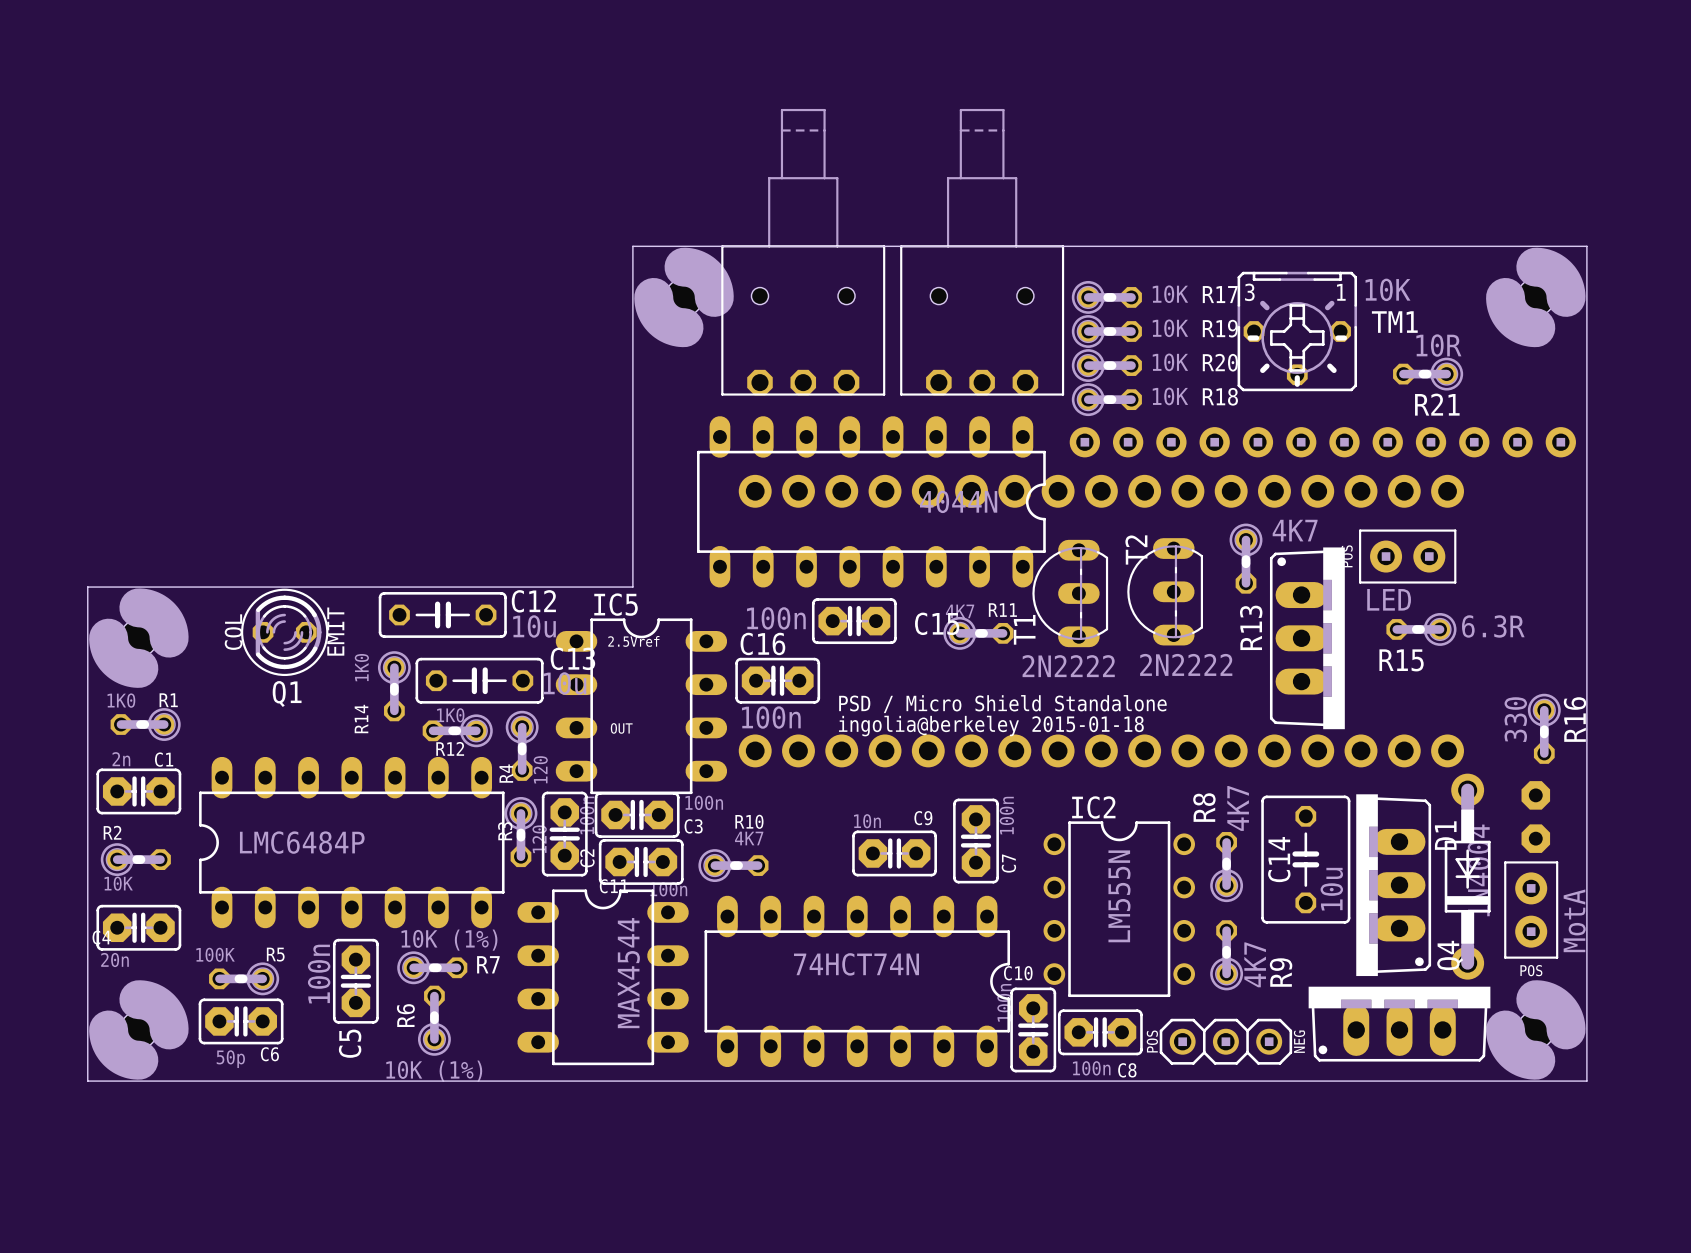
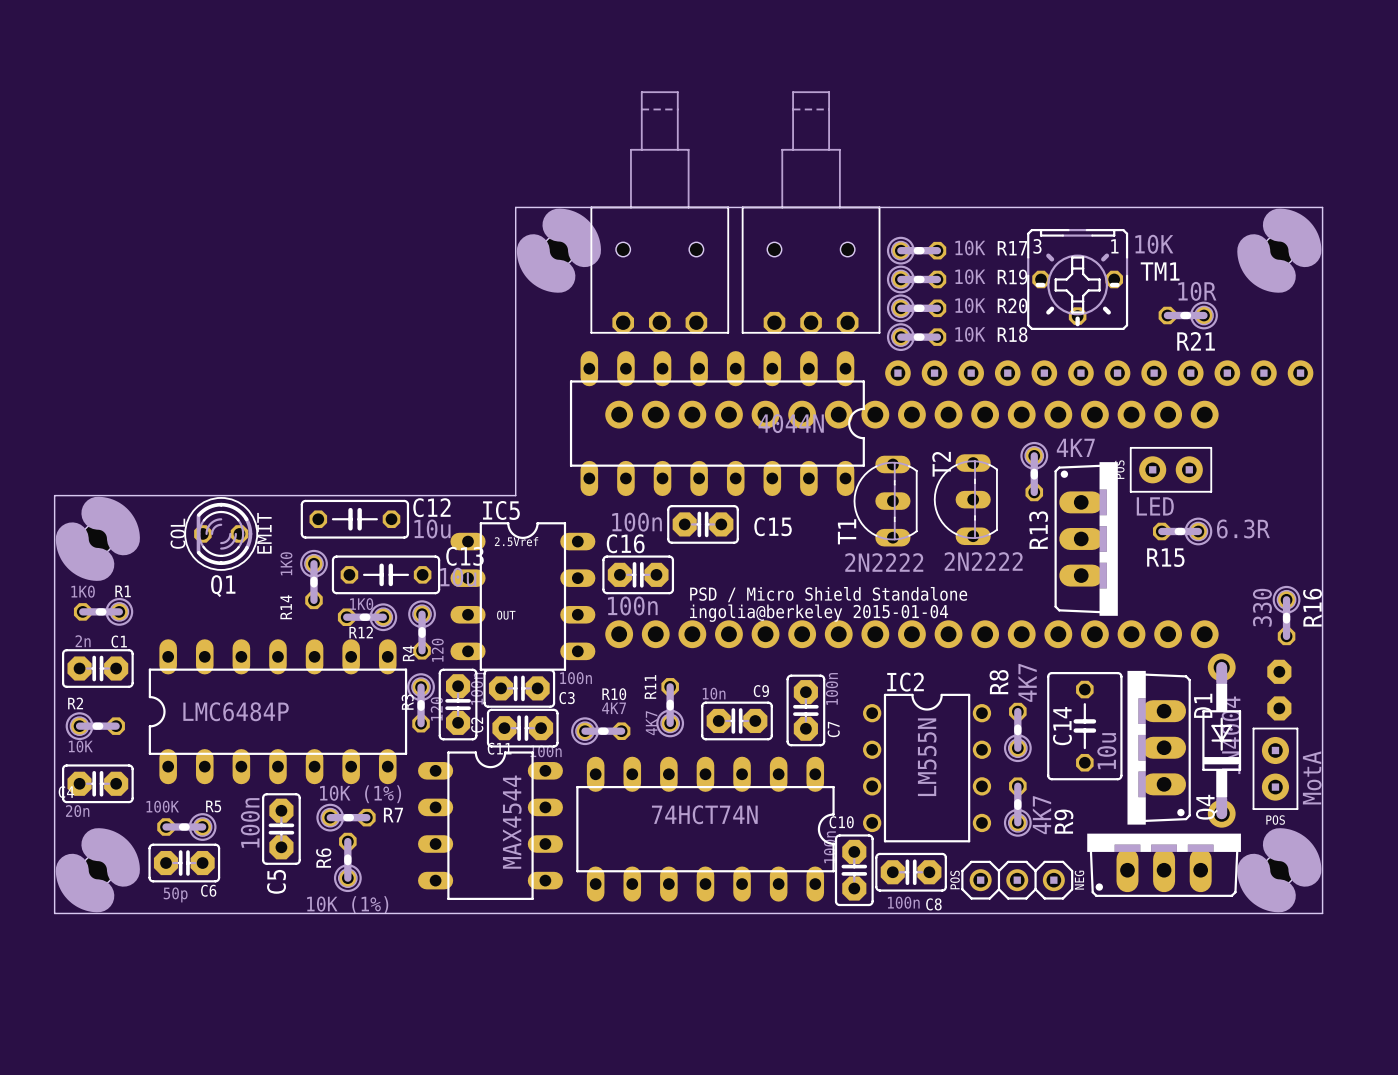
R11 rotation: 0° (978, 633) -> 90° counterclockwise (670, 707)
R11 position: (978, 633) -> (670, 707)
text: ingolia@berkeley 2015-01-18 (991, 726) -> ingolia@berkeley 2015-01-04 (819, 613)

